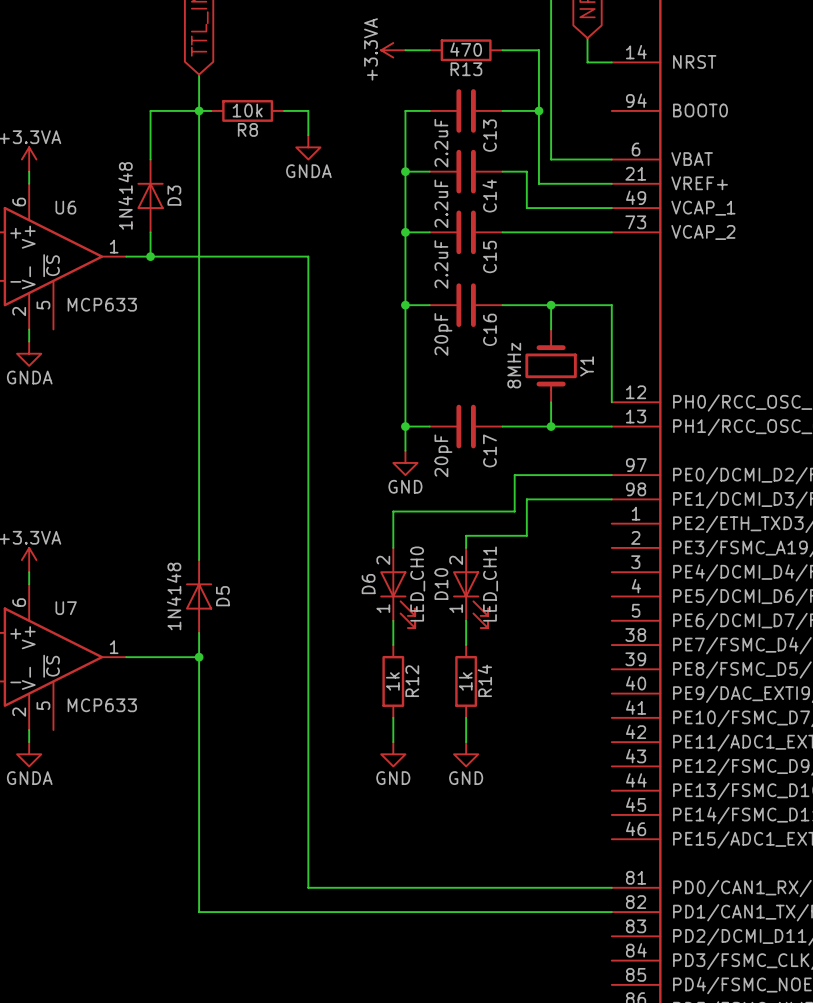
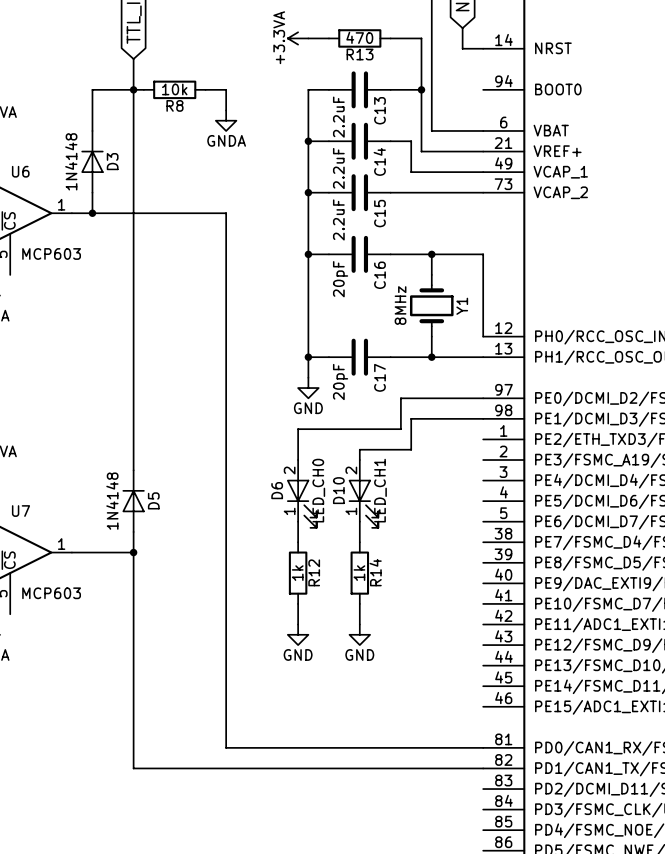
U6 value: MCP633 (102, 304) -> MCP603 (51, 253)
U7 value: MCP633 (102, 705) -> MCP603 (51, 593)

